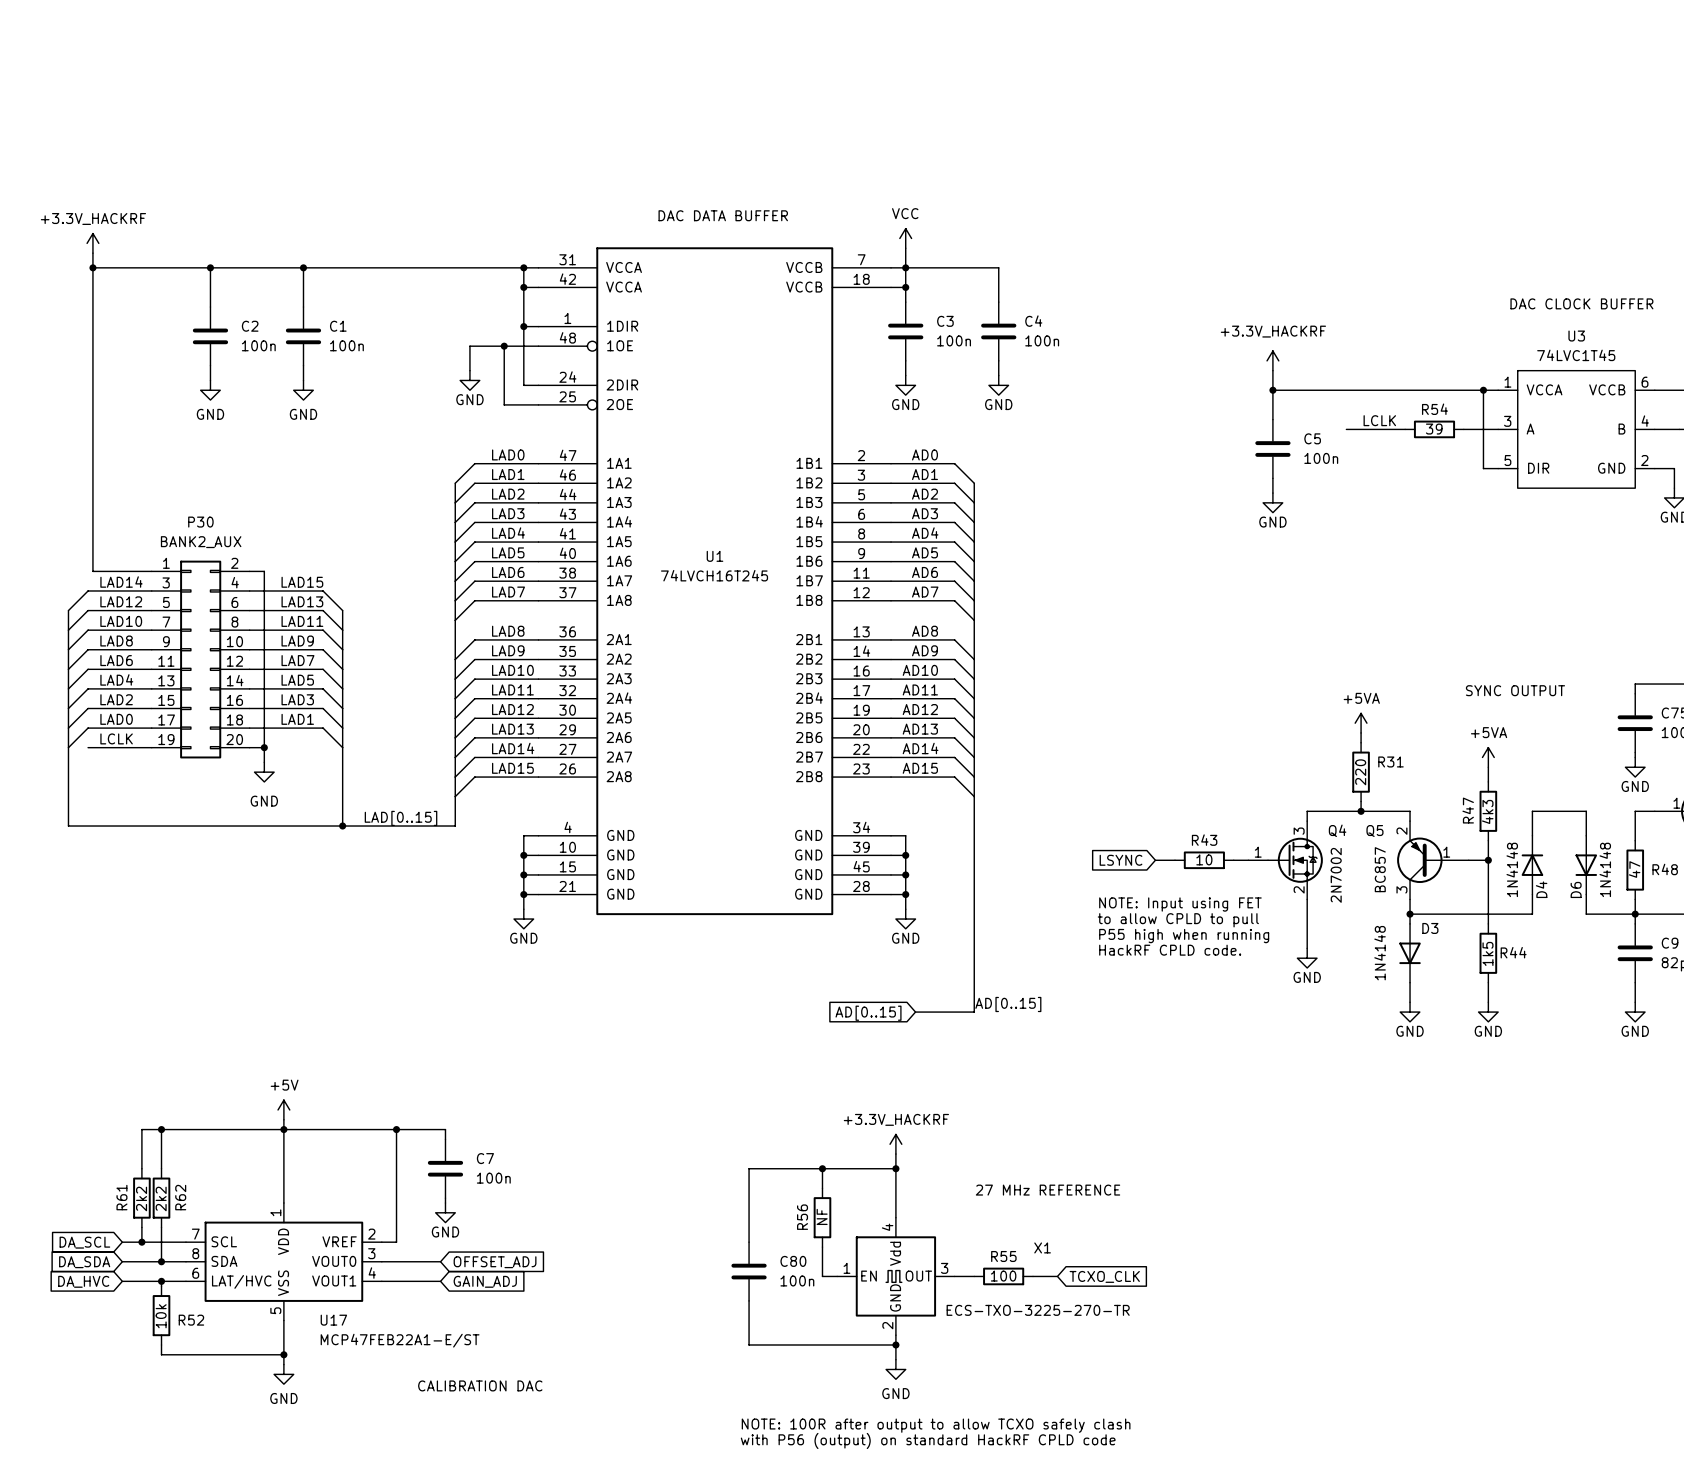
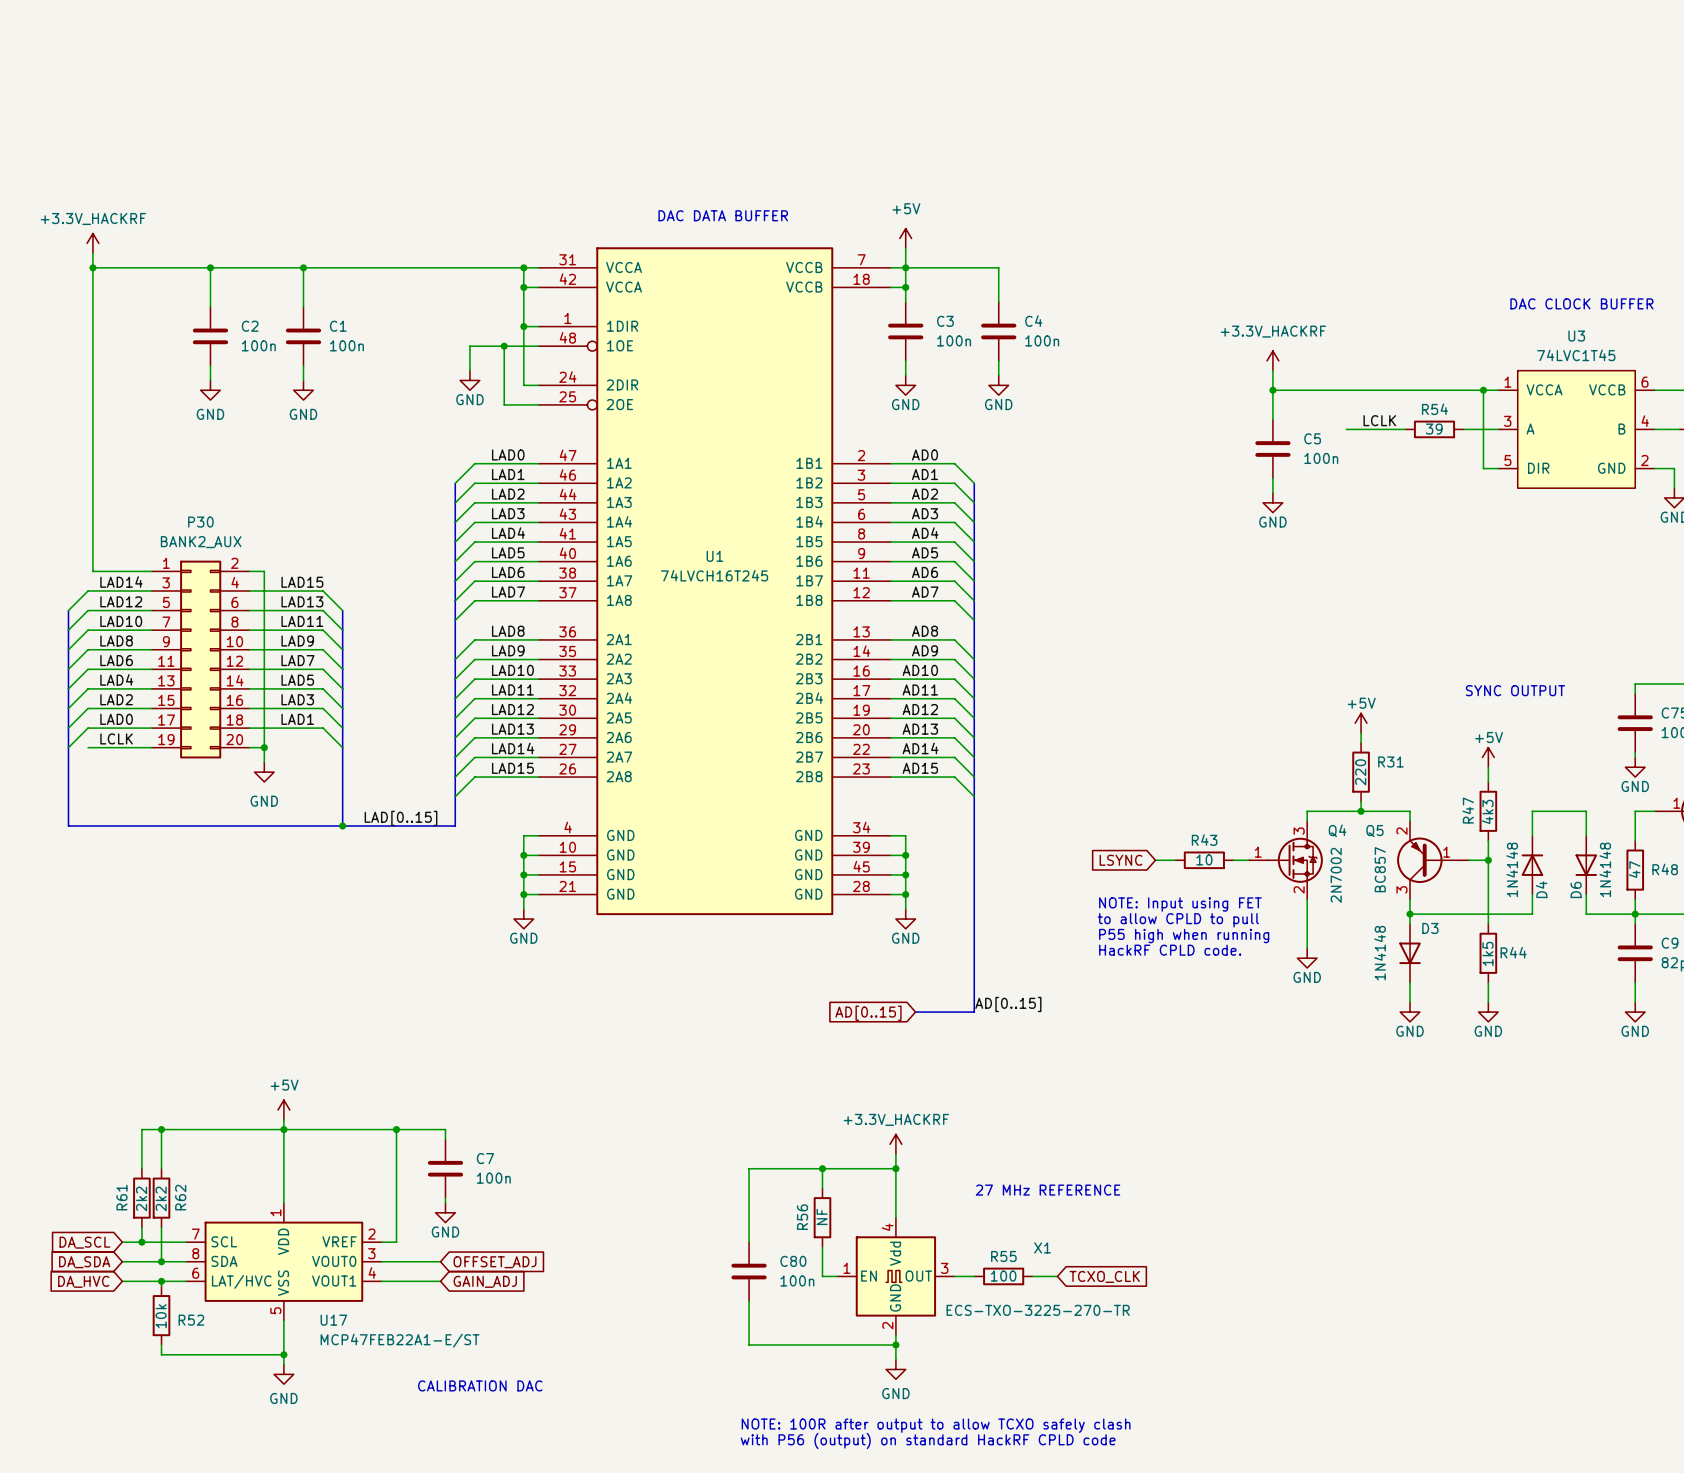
power symbol: VCC (905, 238) -> +5V (905, 238)
power symbol: +5VA (1361, 723) -> +5V (1361, 723)
power symbol: +5VA (1488, 757) -> +5V (1488, 757)

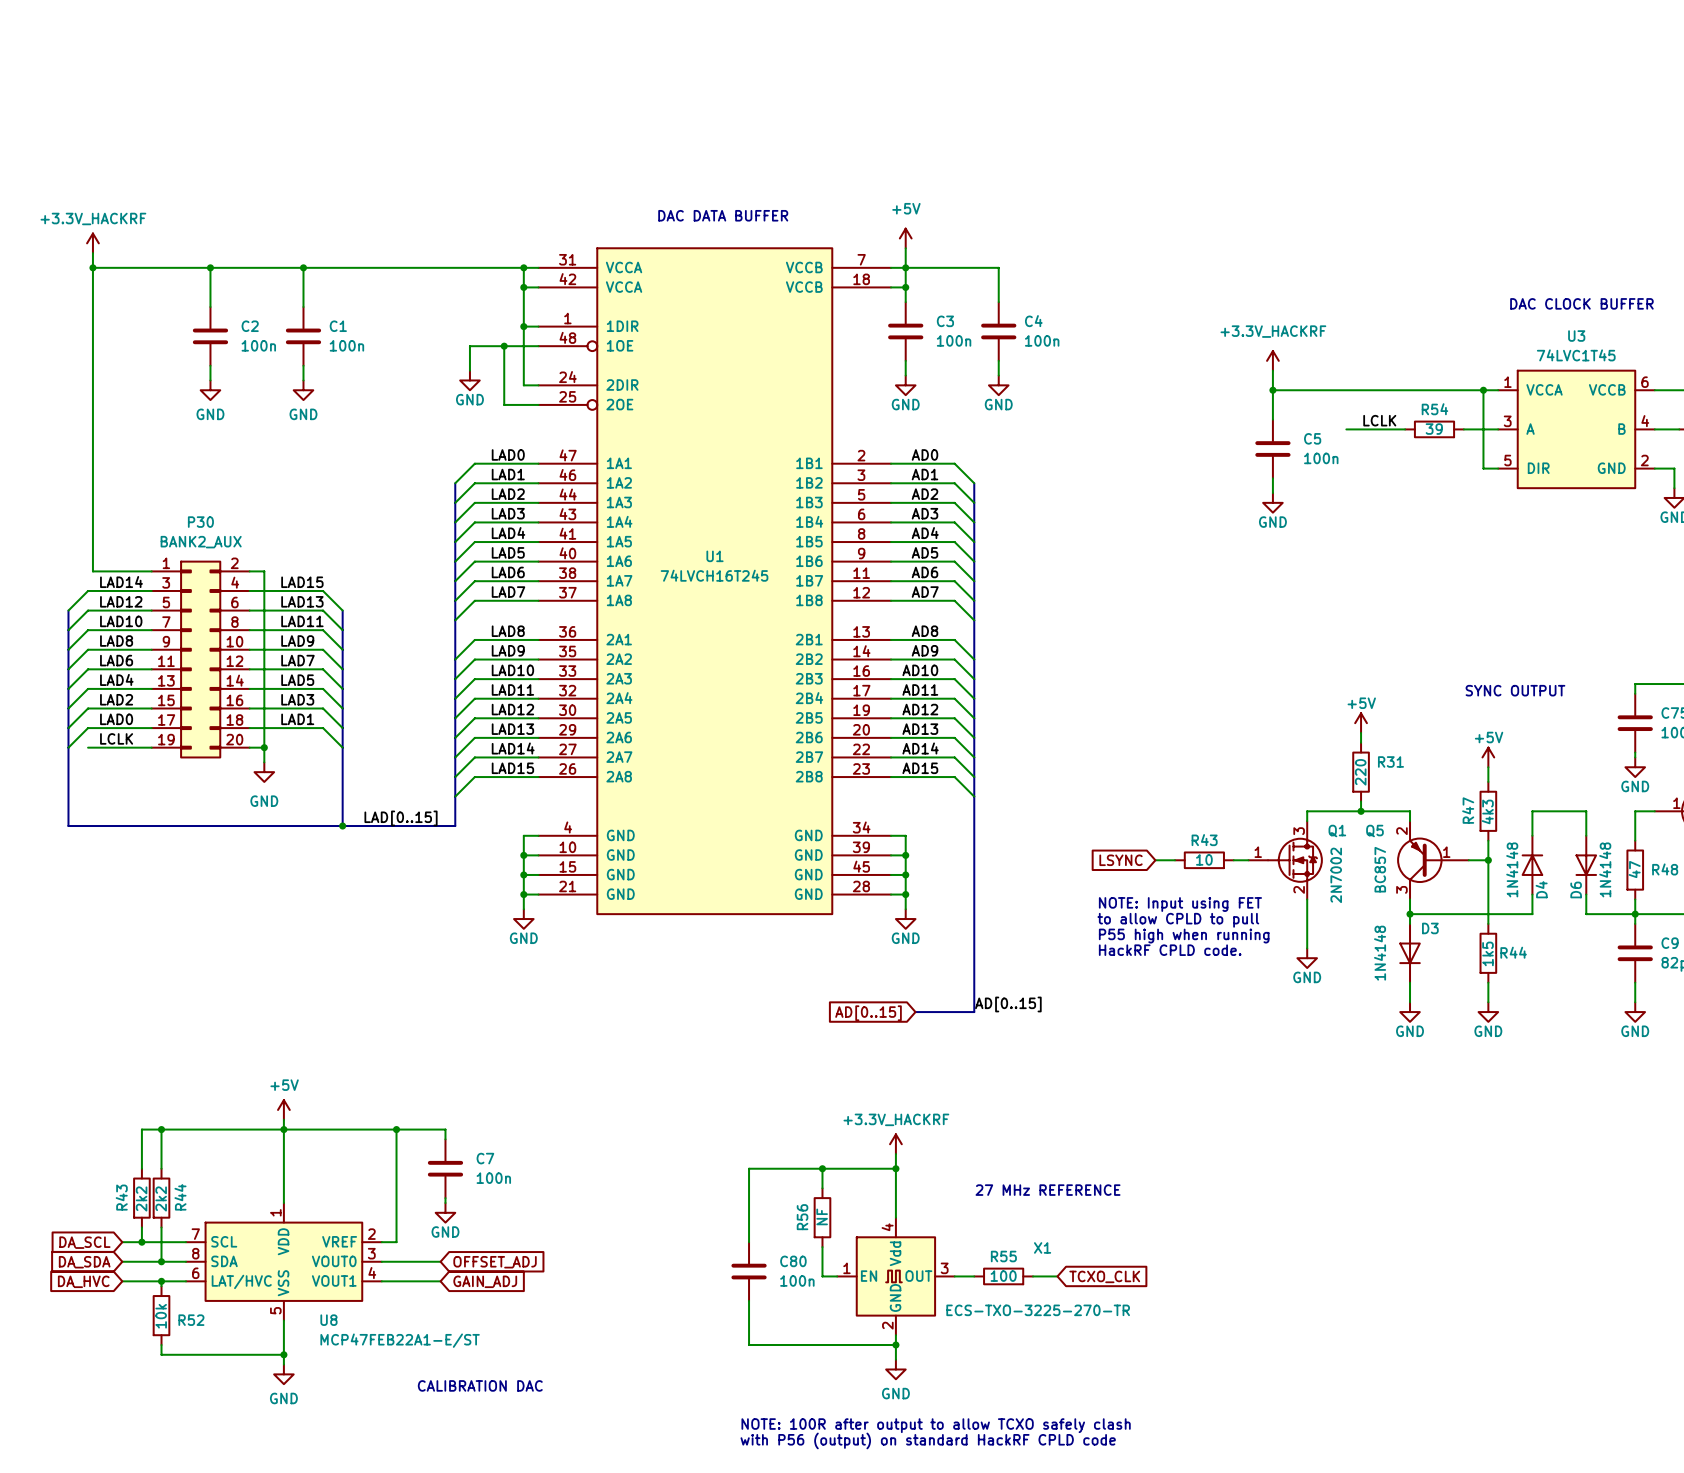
Q4 name: Q4 (1337, 830) -> Q1 (1337, 831)
R61 name: R61 (121, 1197) -> R43 (121, 1197)
R62 name: R62 (180, 1197) -> R44 (180, 1197)
U17 name: U17 (333, 1320) -> U8 (328, 1320)

